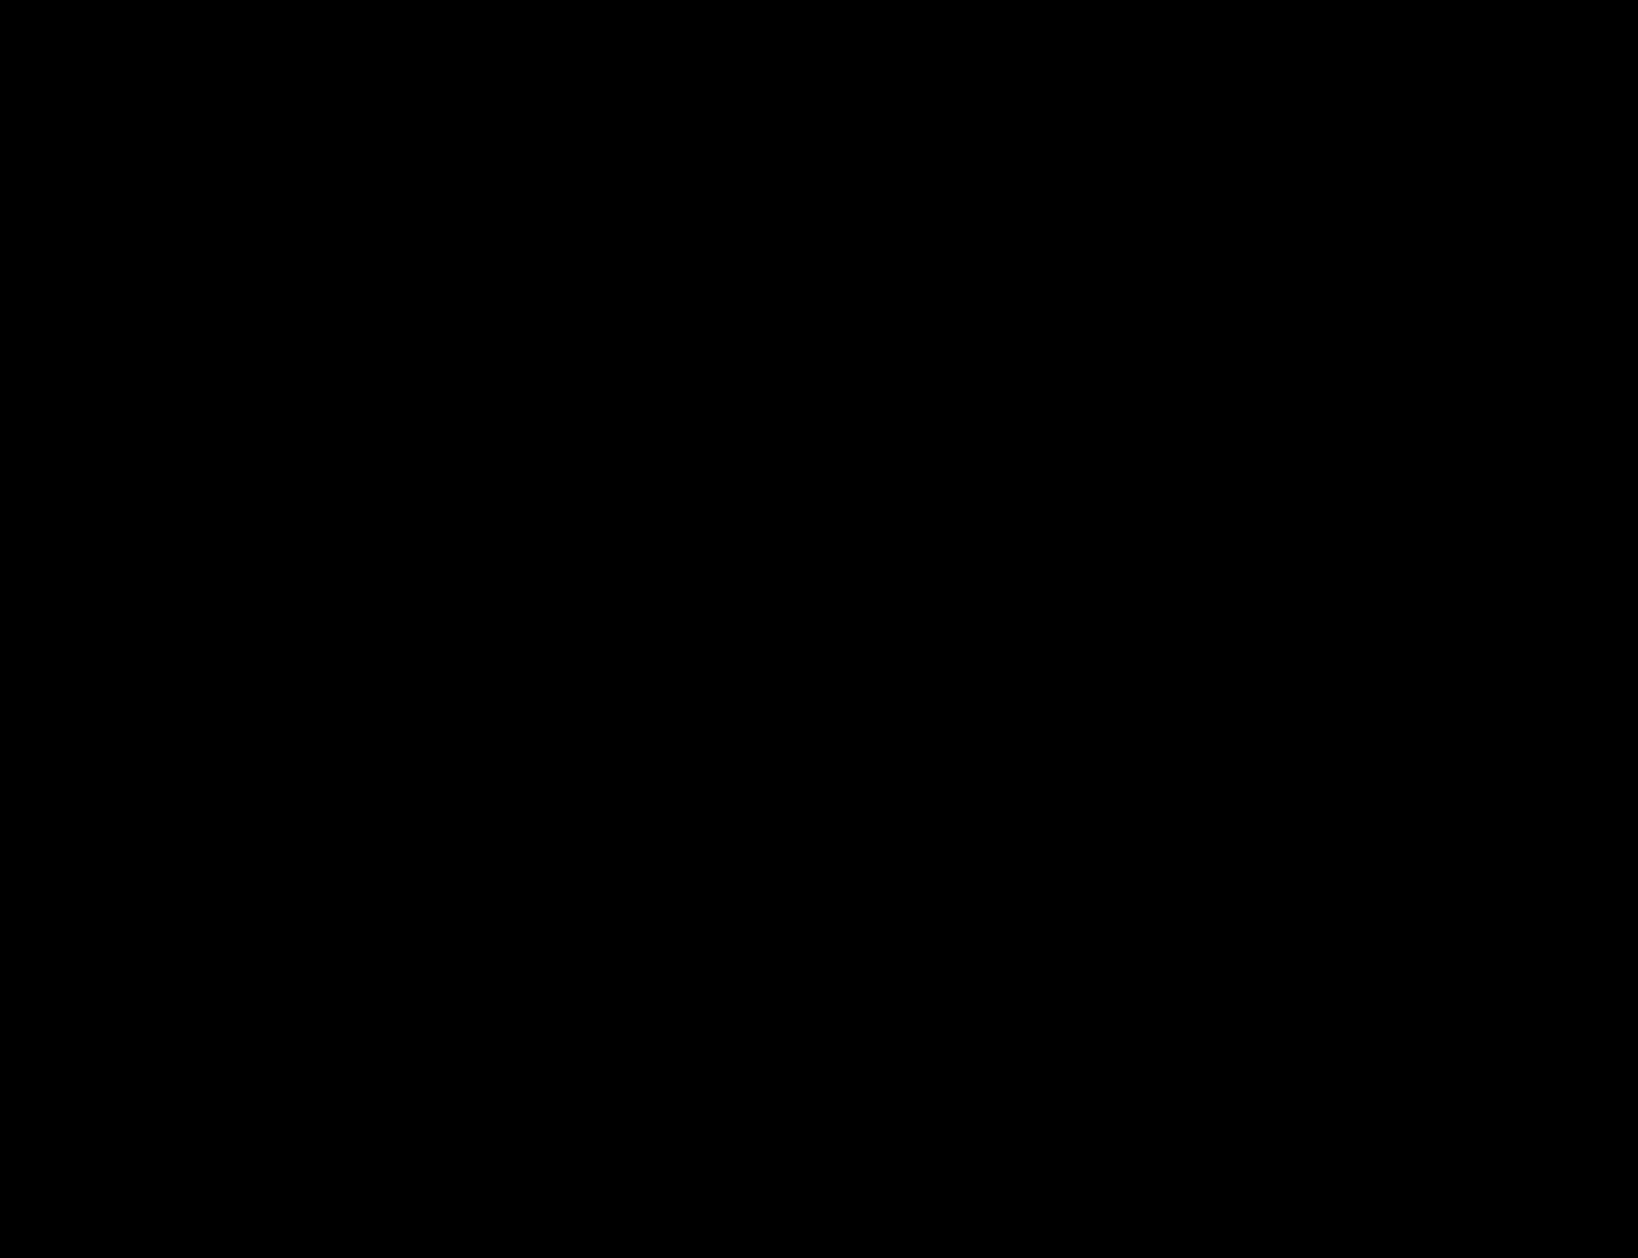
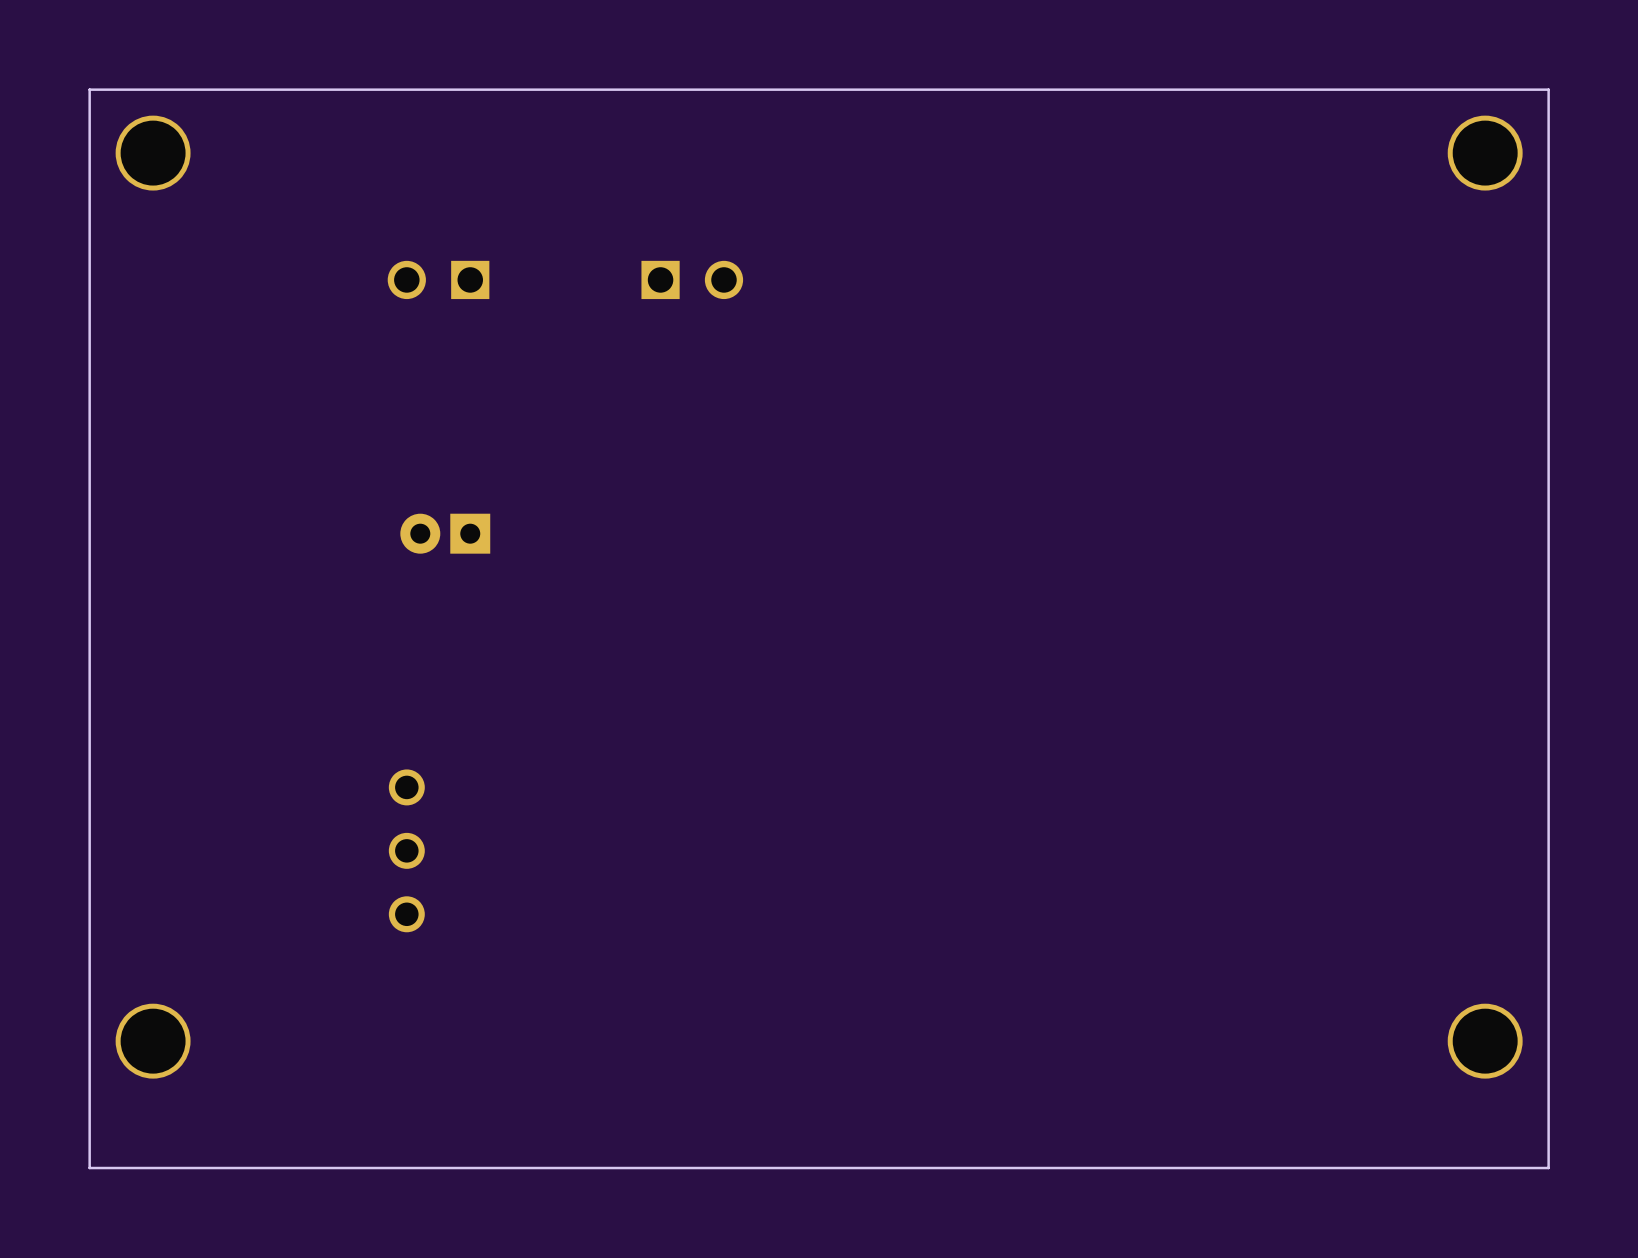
board edge: none -> (1548, 89) (89, 89) (89, 1168) (1548, 1168) (1548, 89)
part: none -> (153, 153)
part: none -> (1485, 153)
part: none -> (438, 279)
part: none -> (692, 279)
part: none -> (445, 533)
part: none -> (406, 850)
part: none -> (153, 1041)
part: none -> (1485, 1041)

